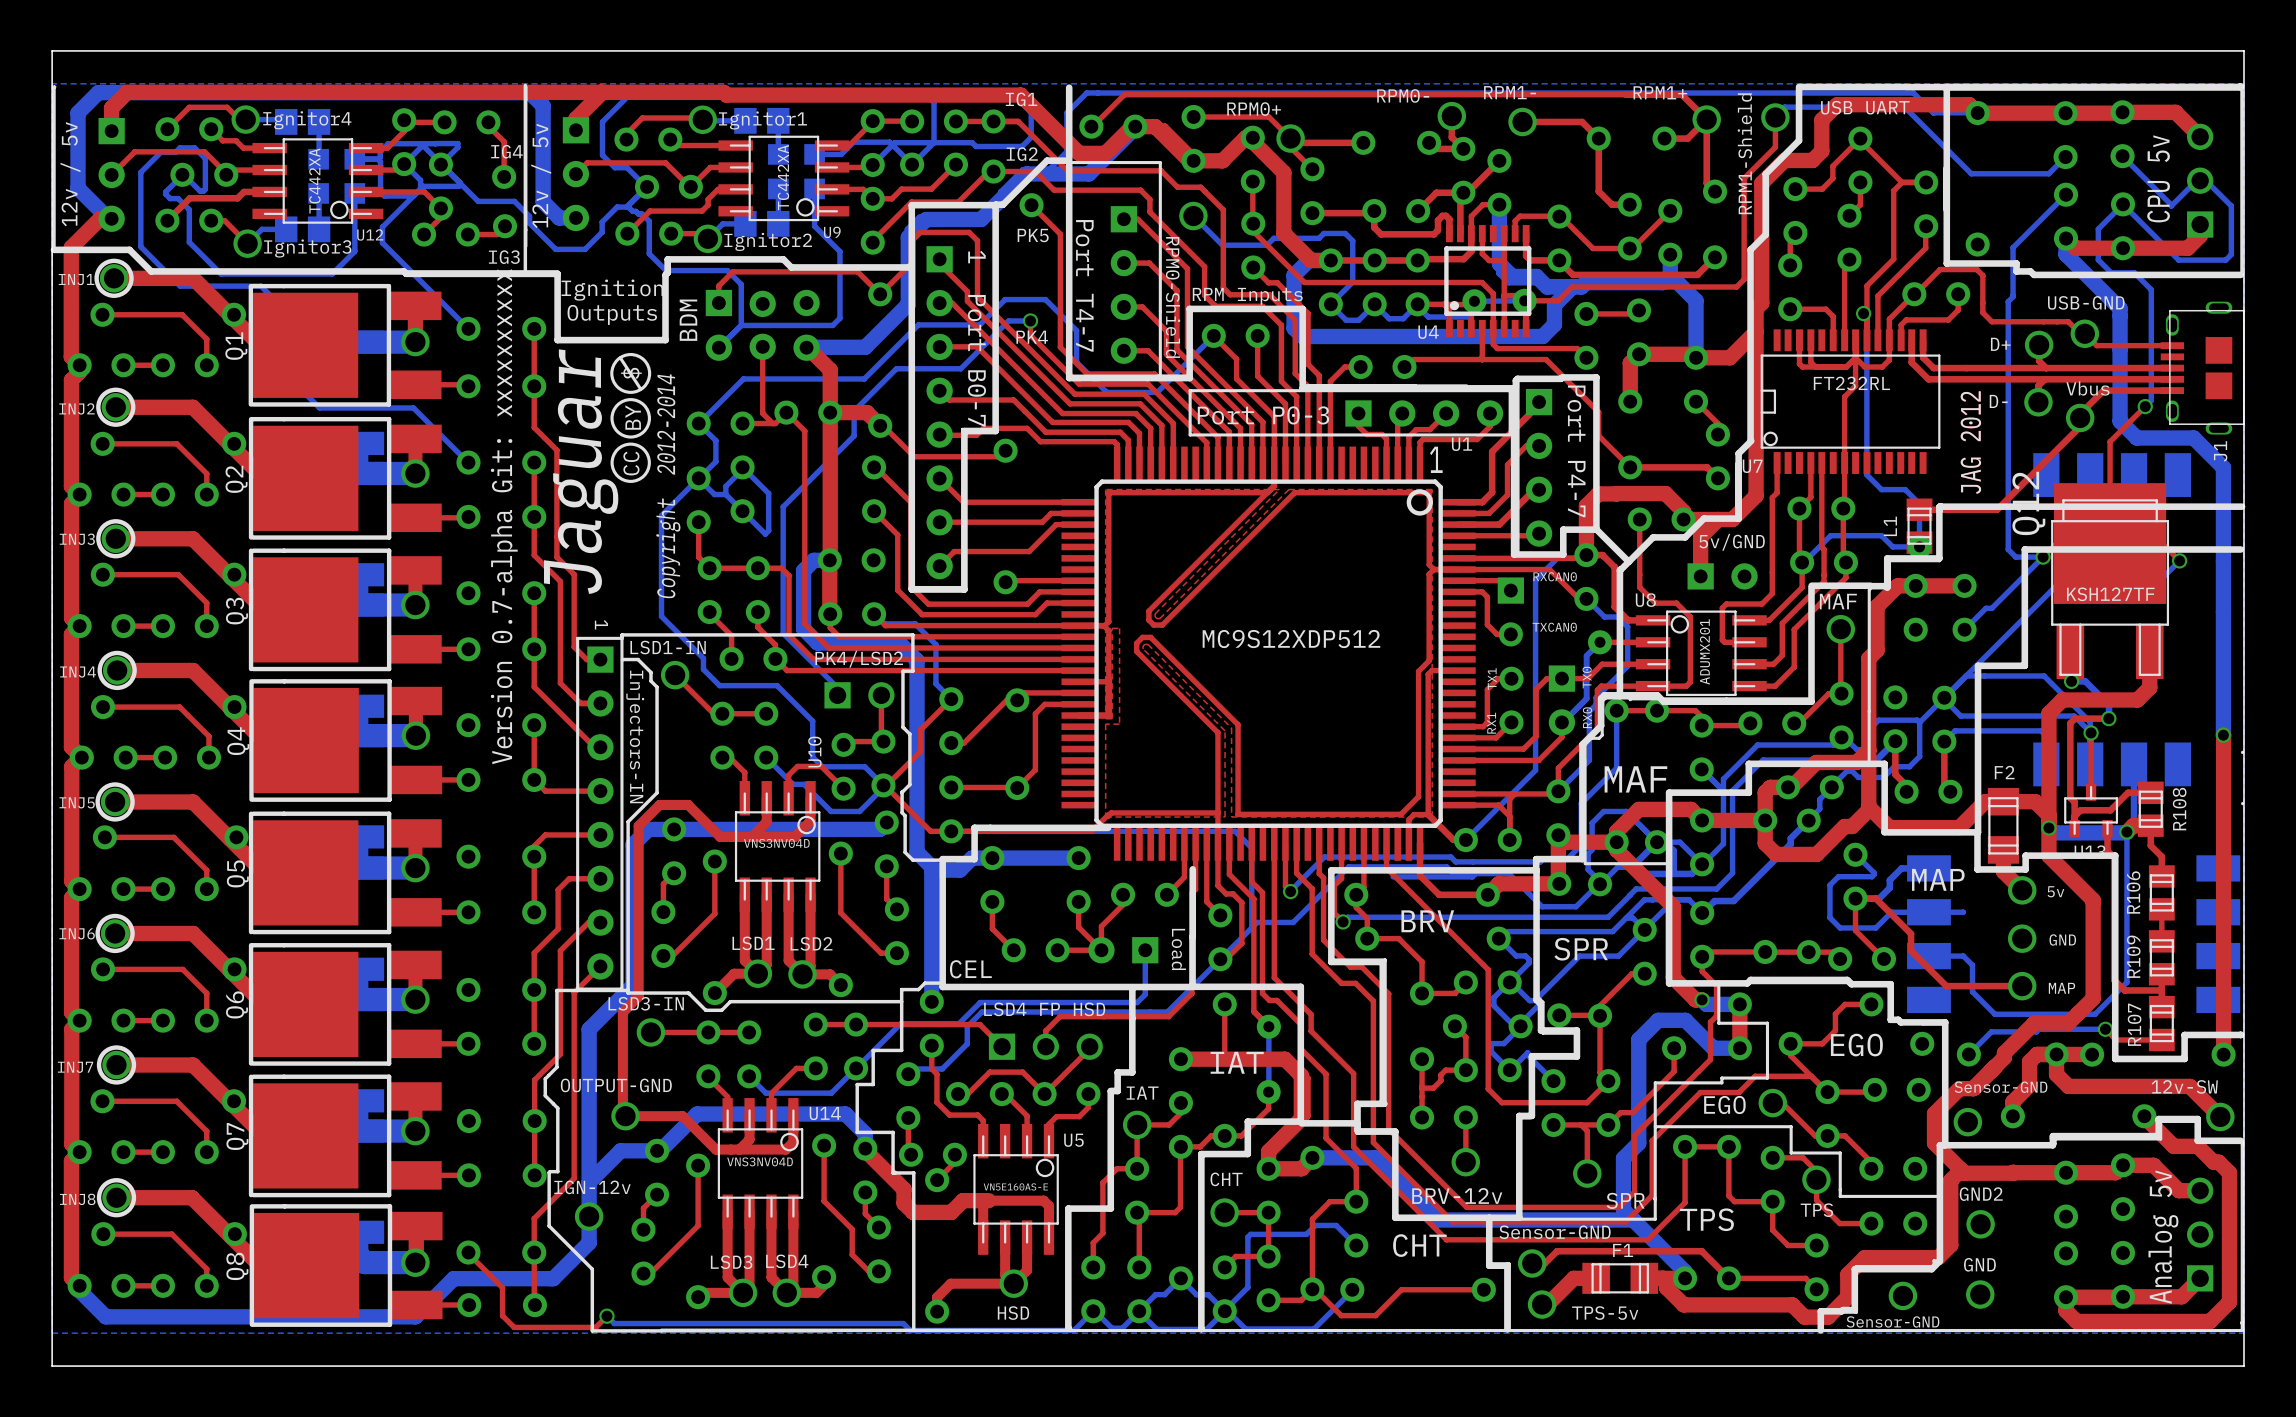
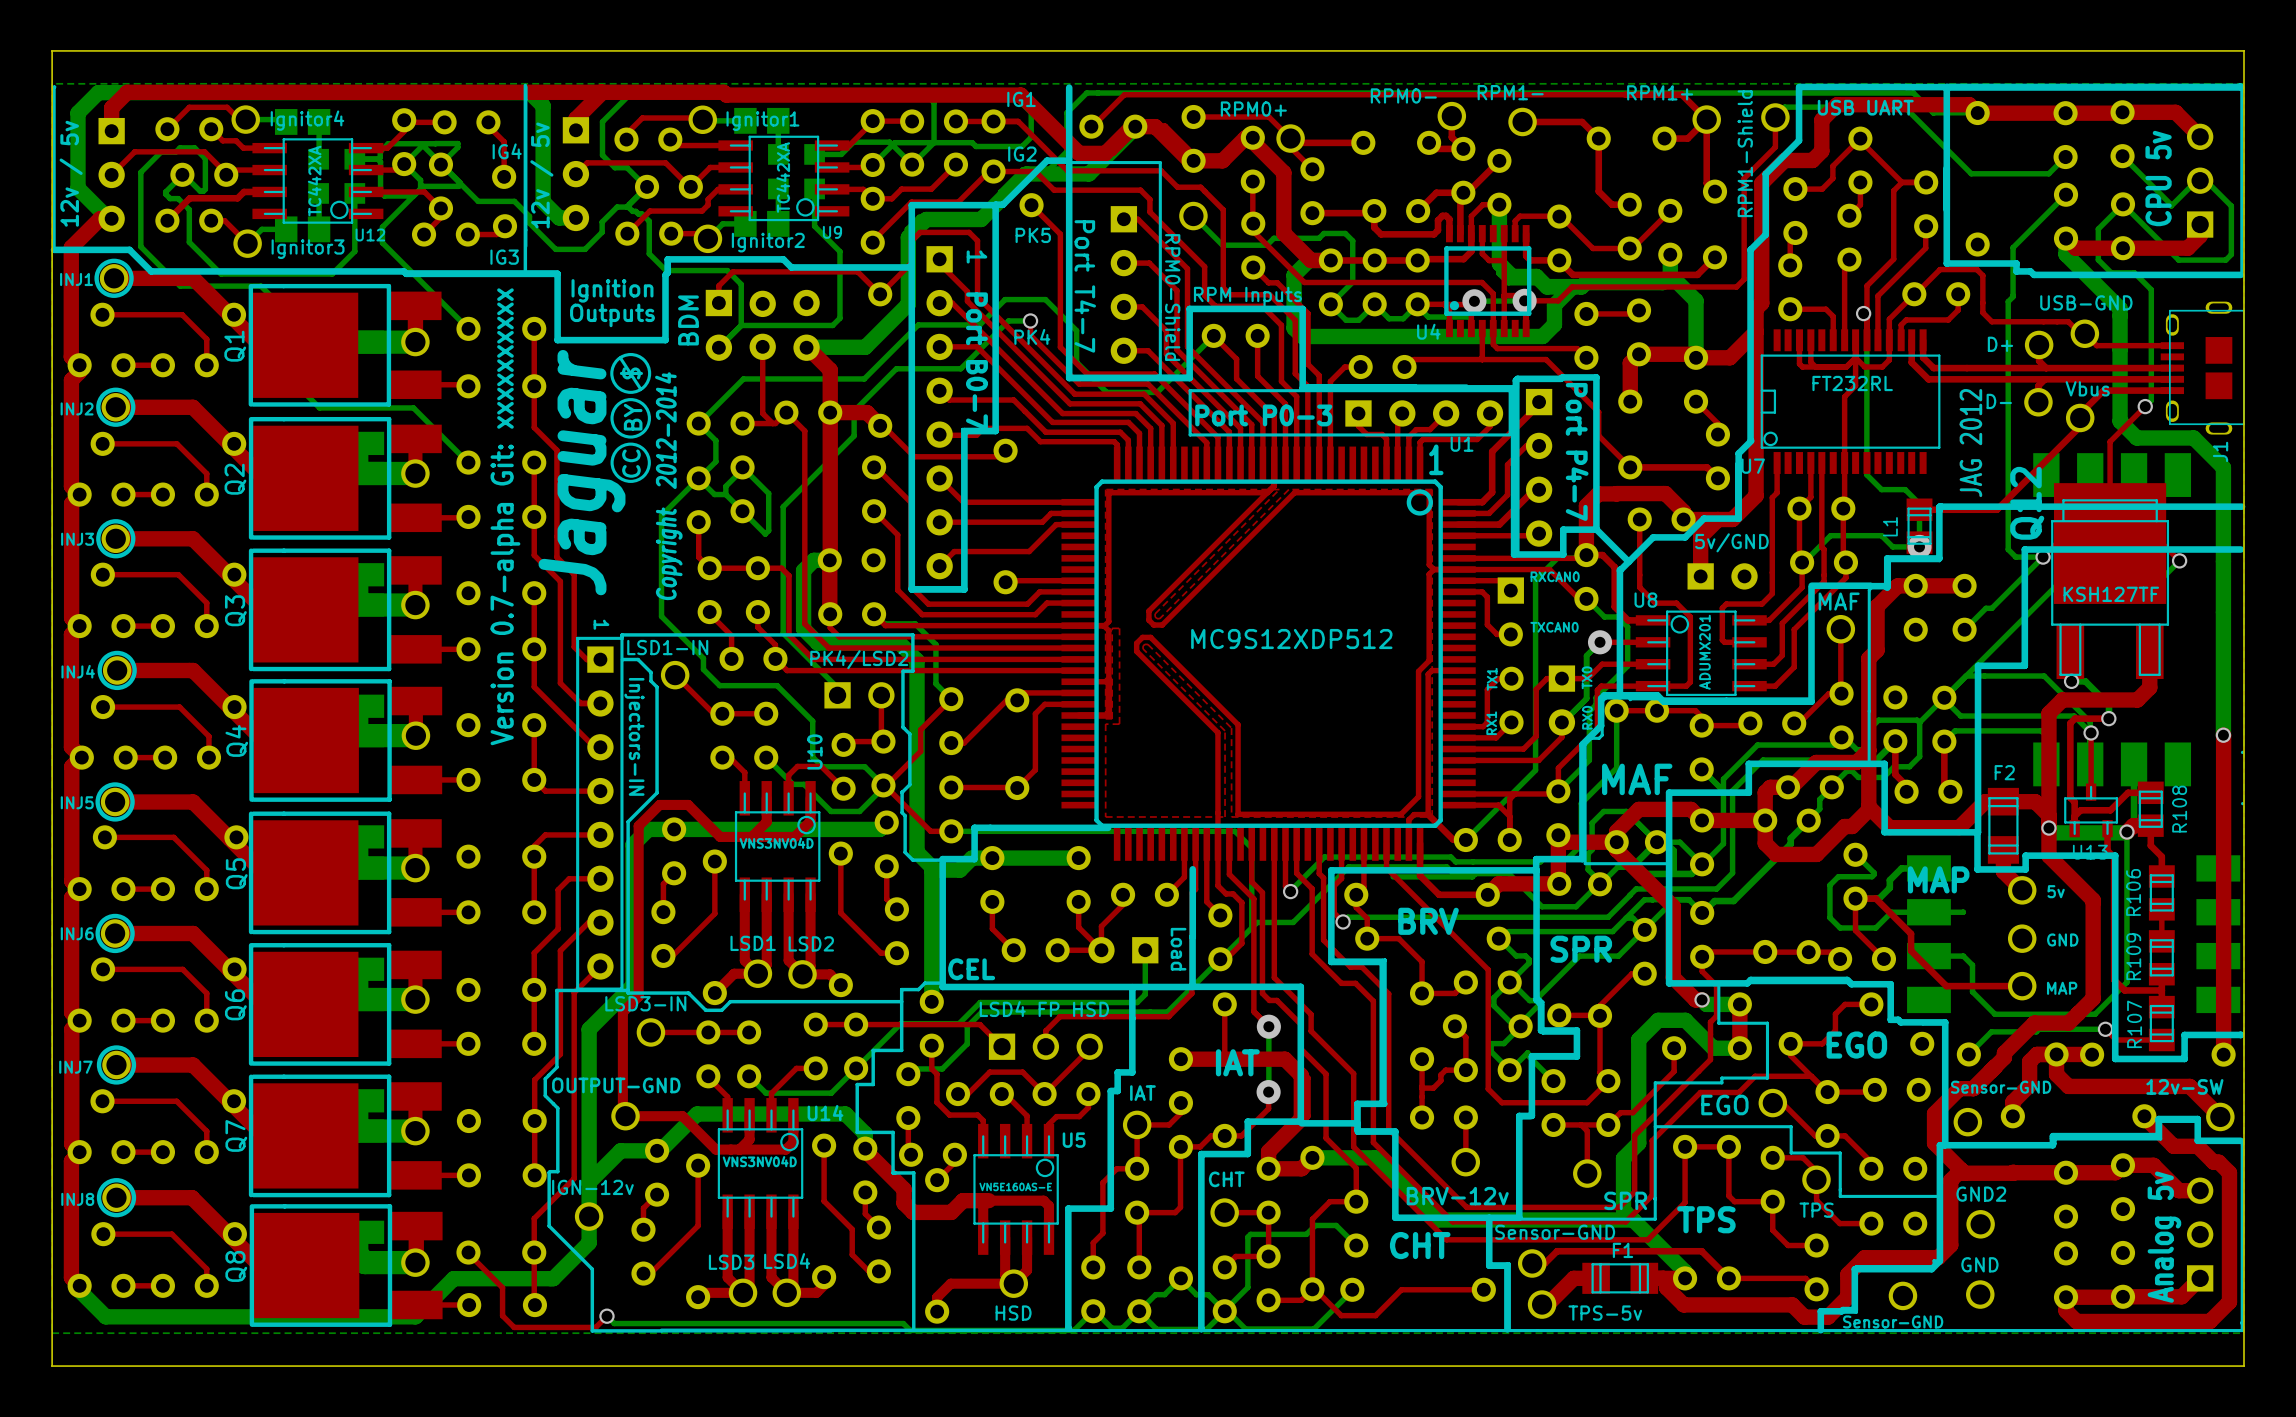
top track: (1217, 812) (1111, 812) (1091, 831) (951, 831) -> none

